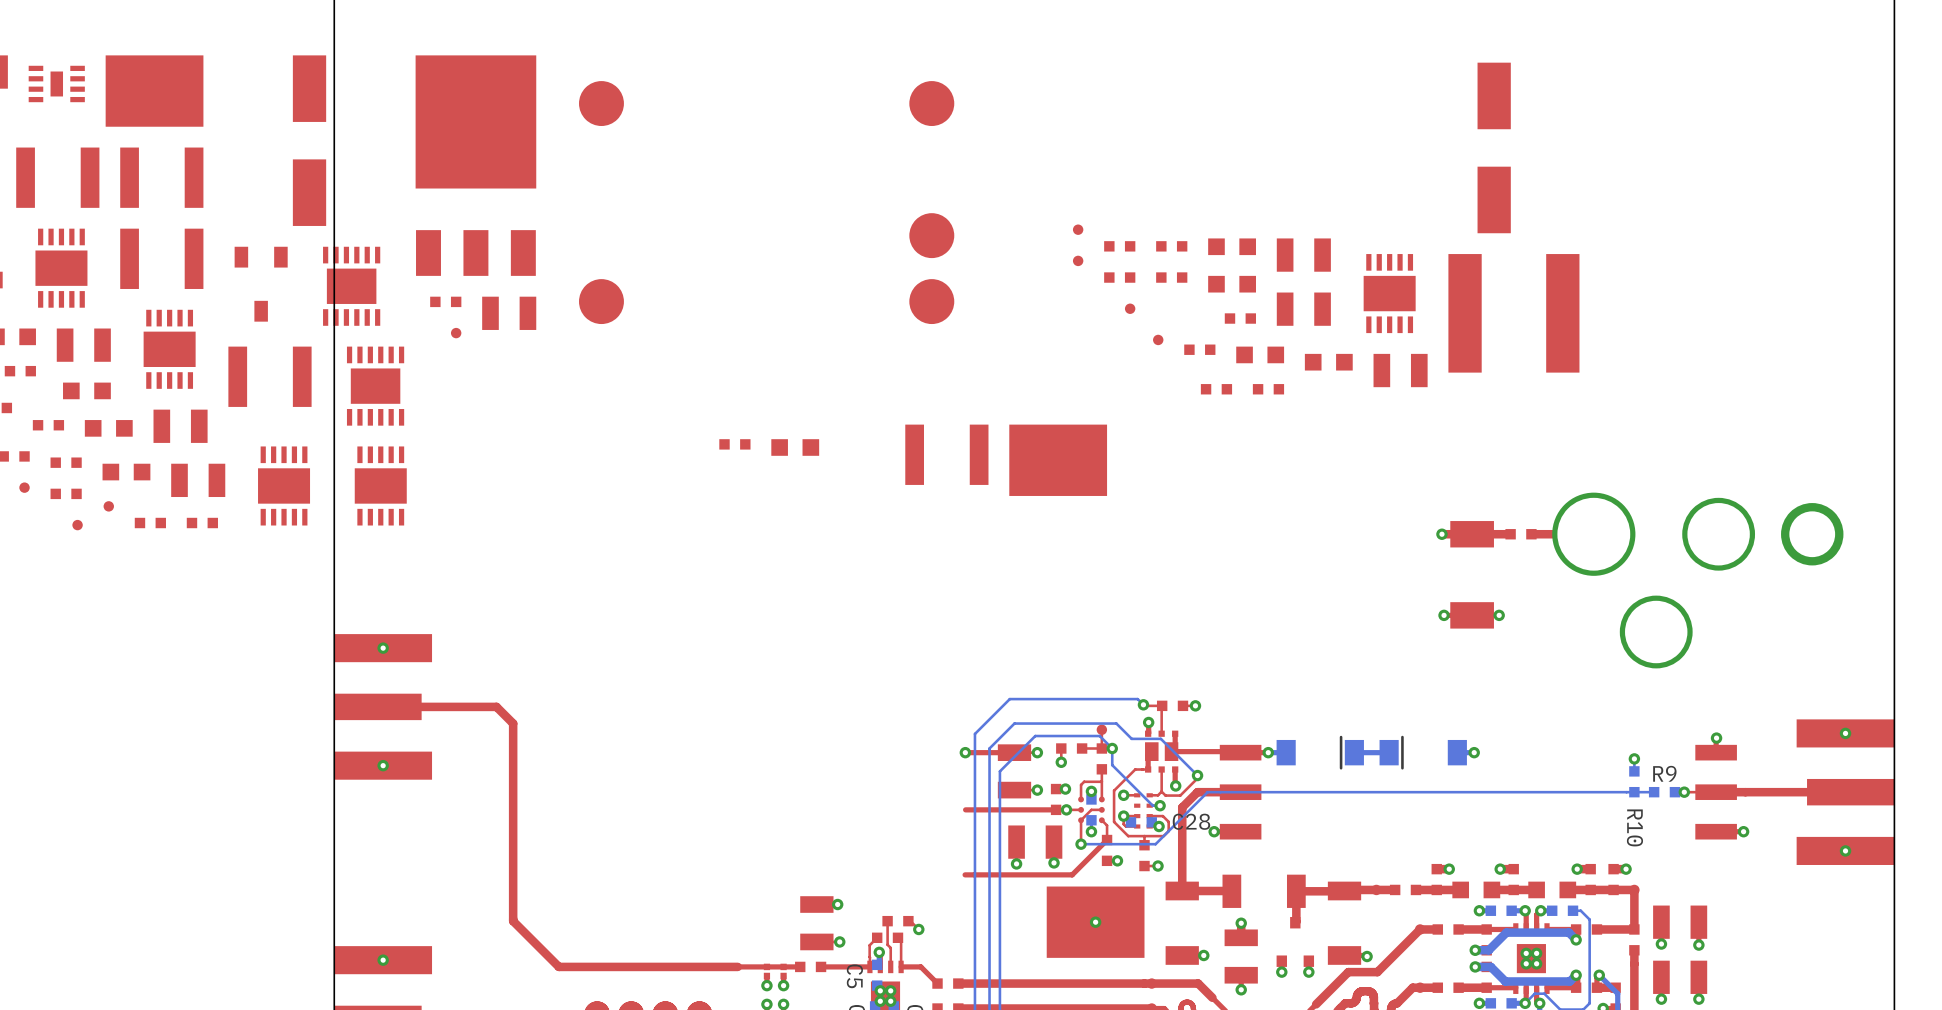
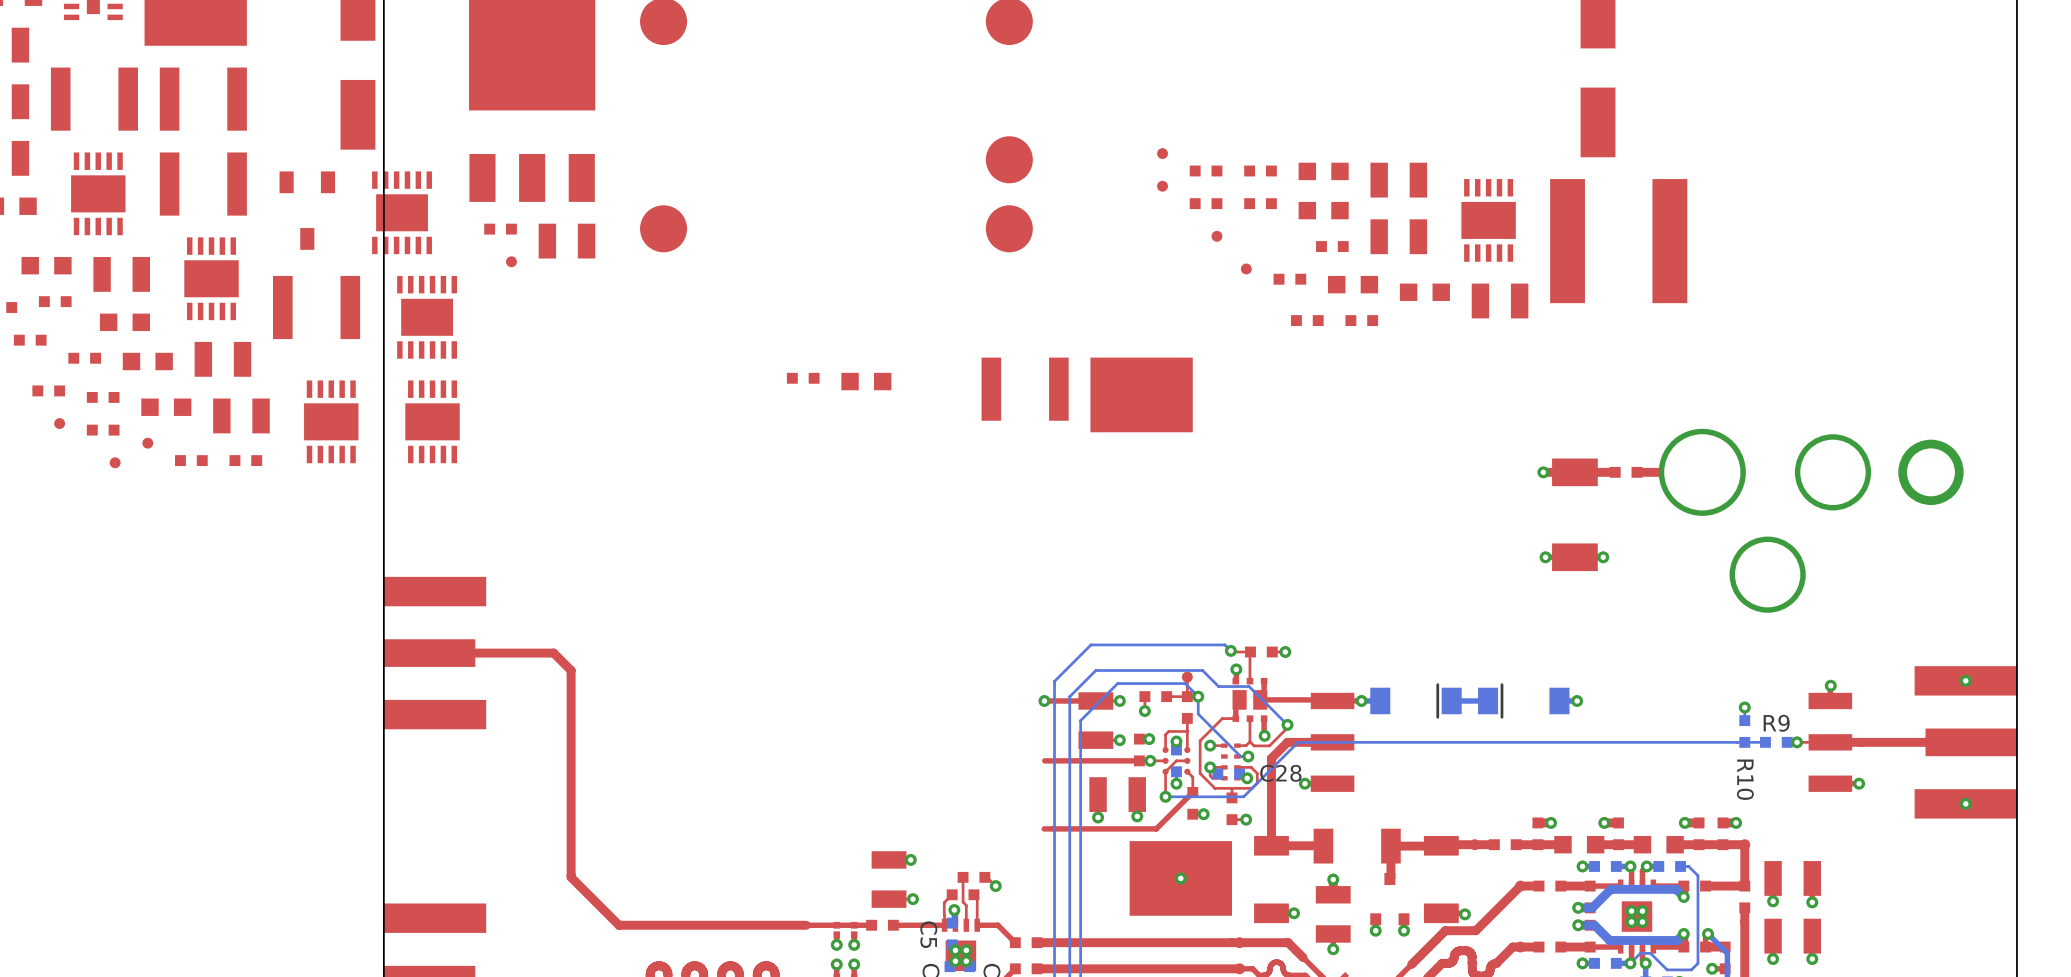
via: (383, 648) -> none
via: (383, 765) -> none
via: (383, 960) -> none

